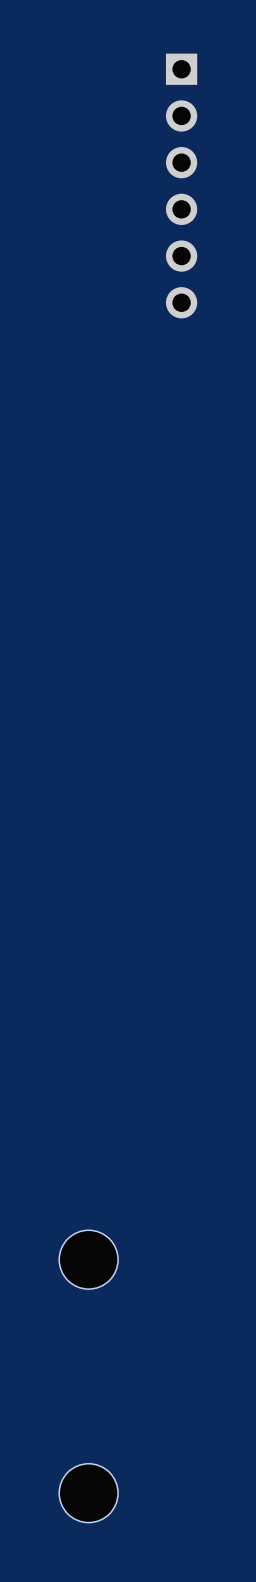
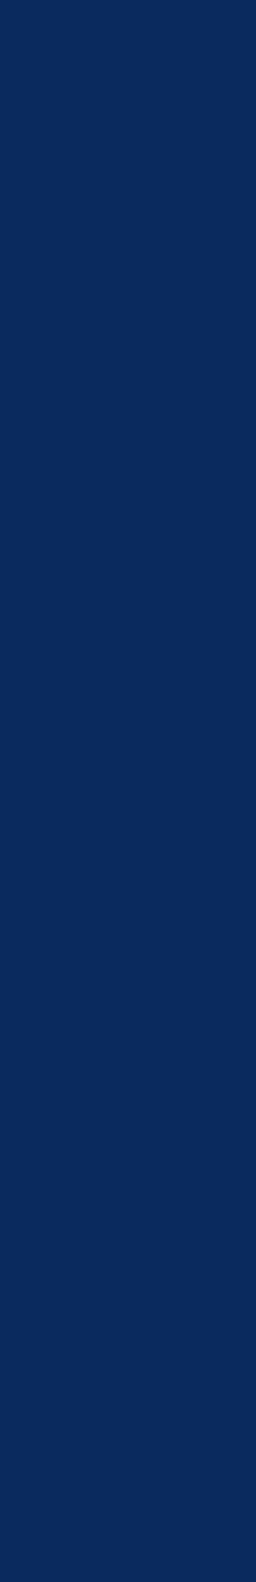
part: (181, 186) -> none
part: (88, 1259) -> none
part: (88, 1493) -> none

